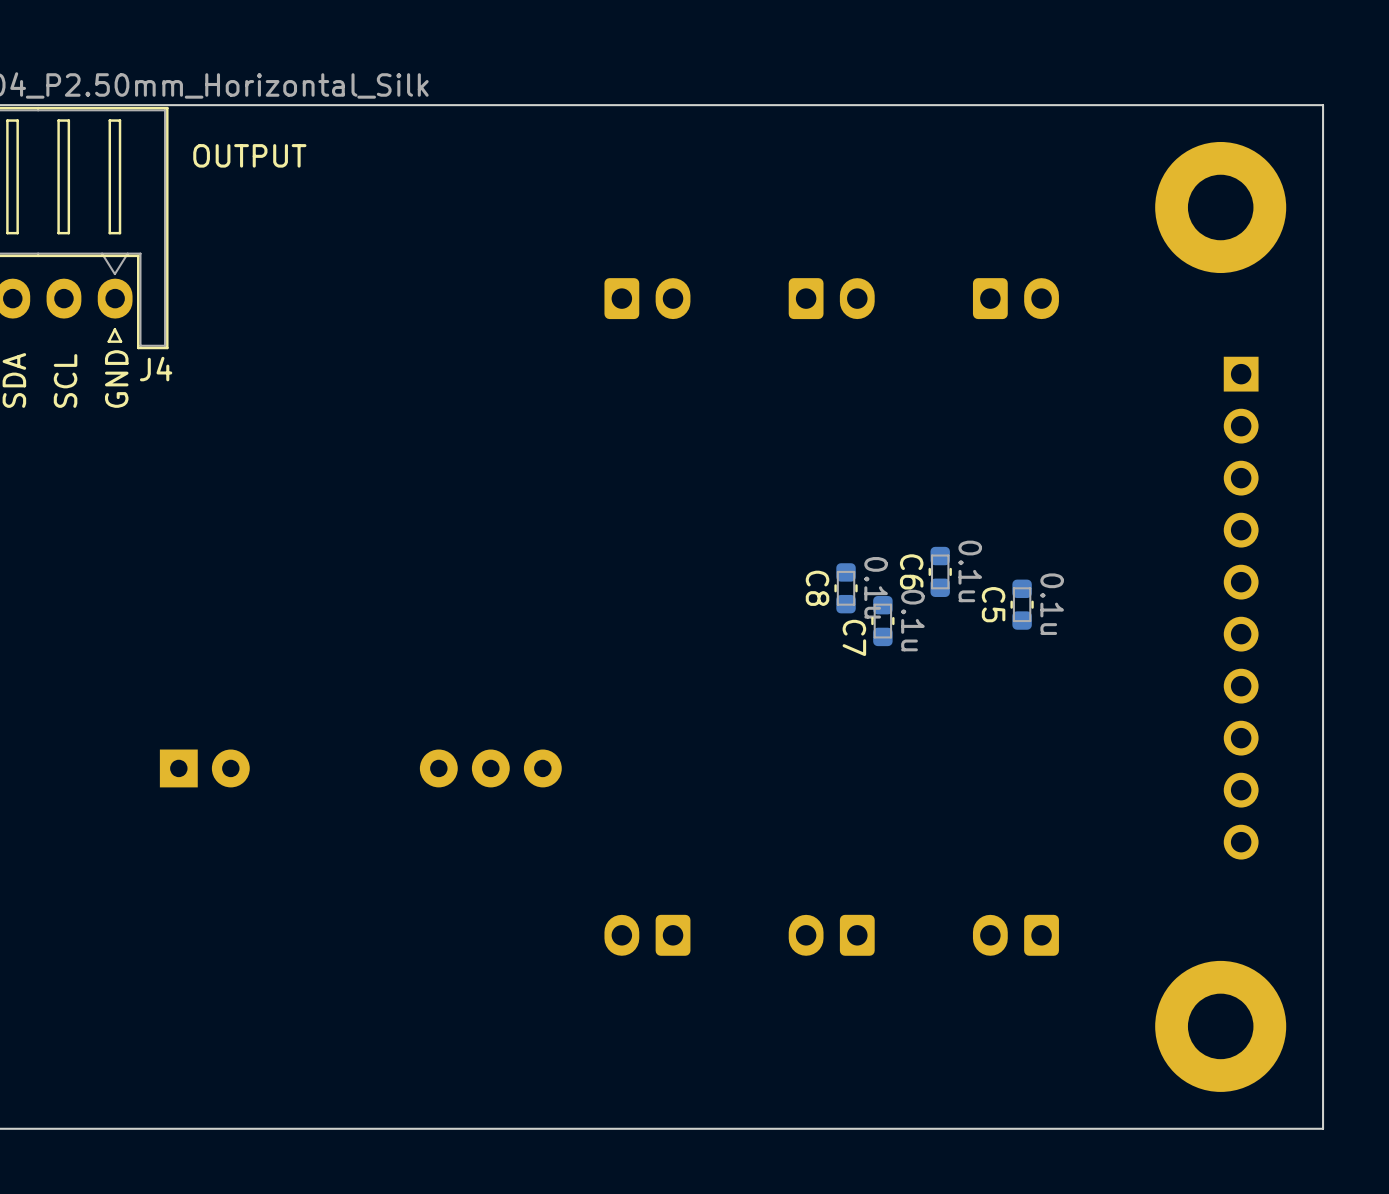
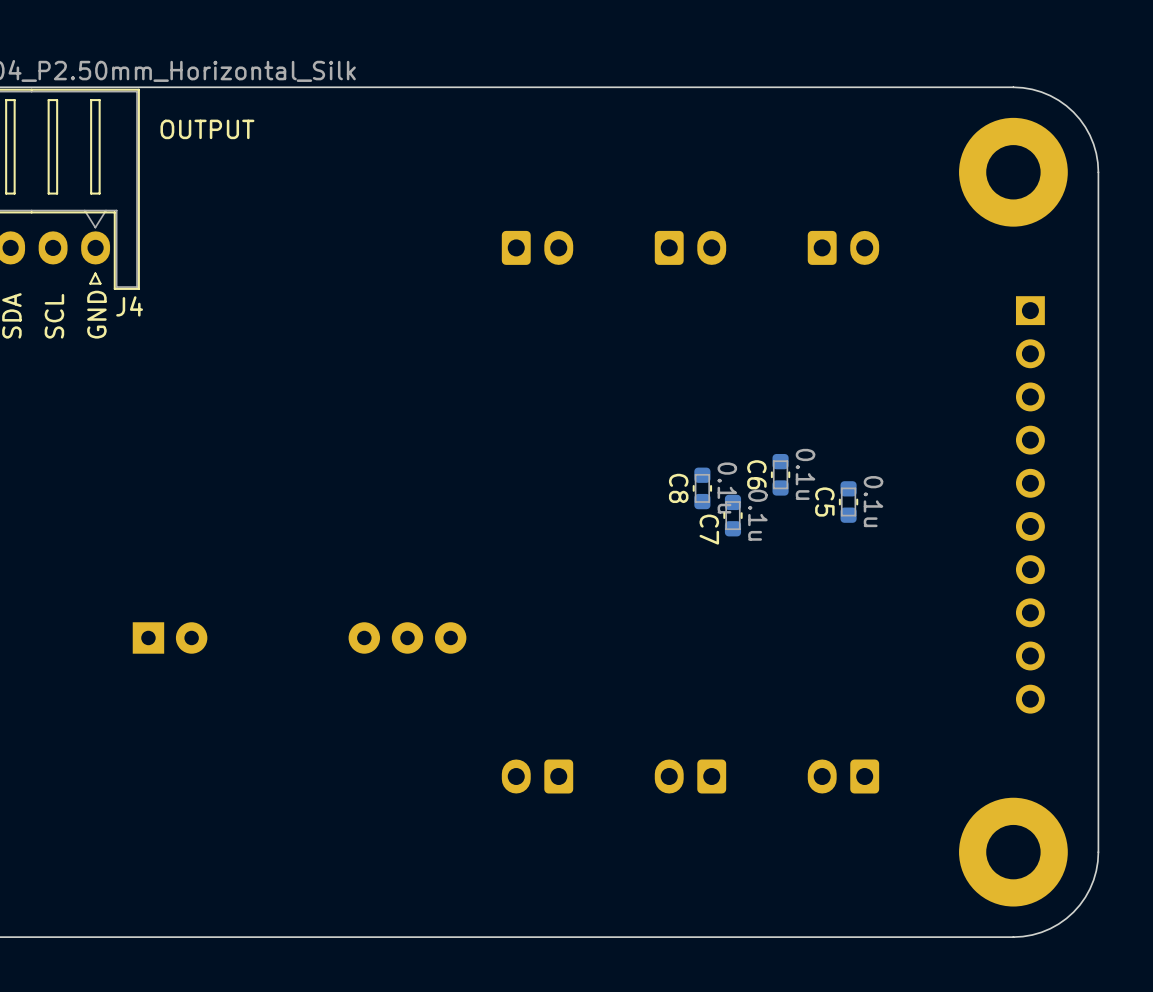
board edge: (1220, 105) (1323, 105) (1323, 207) -> (1013, 87) (1041, 92) (1058, 100) (1073, 112) (1085, 127) (1093, 144) (1098, 172)
board edge: (1323, 1026) (1323, 1128) (1220, 1128) -> (1098, 852) (1096, 871) (1089, 889) (1073, 912) (1058, 924) (1041, 932) (1013, 937)

